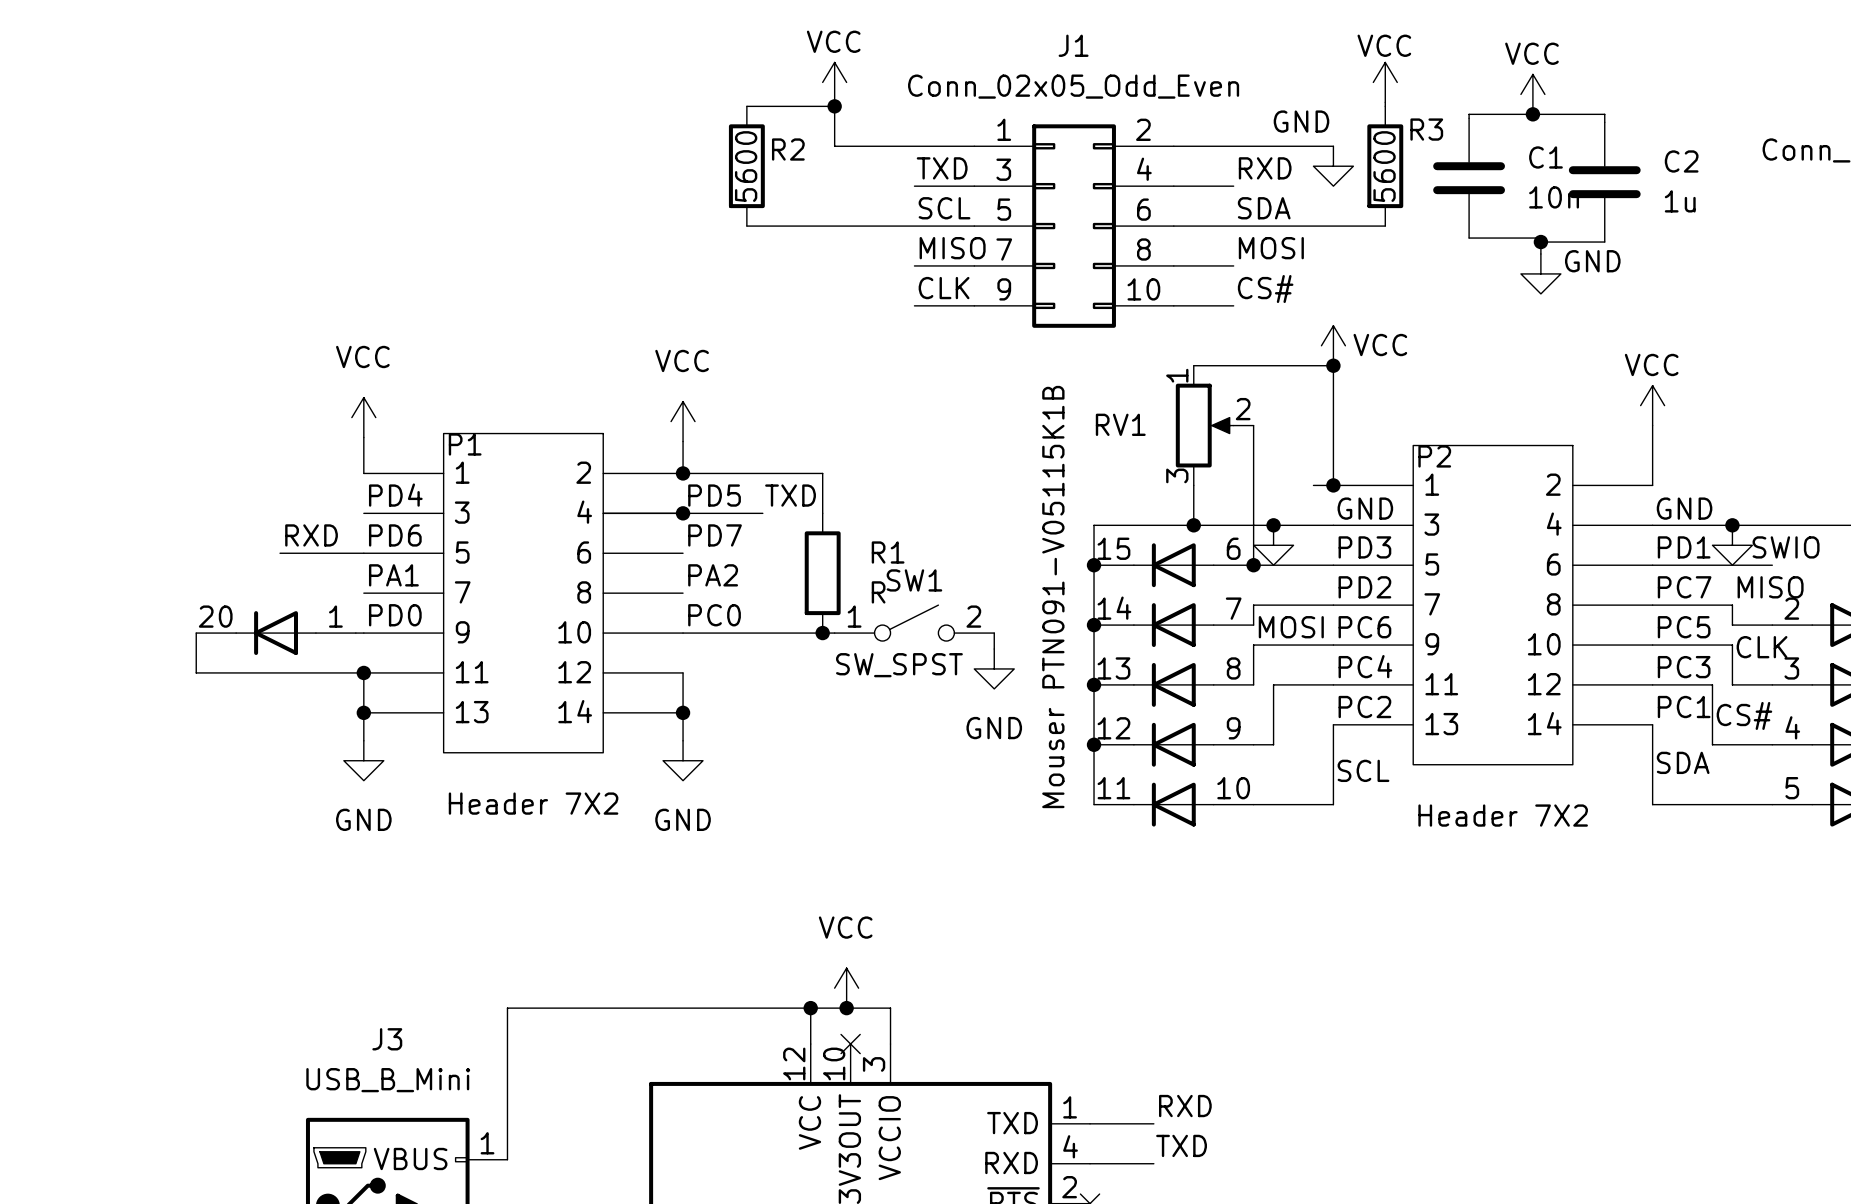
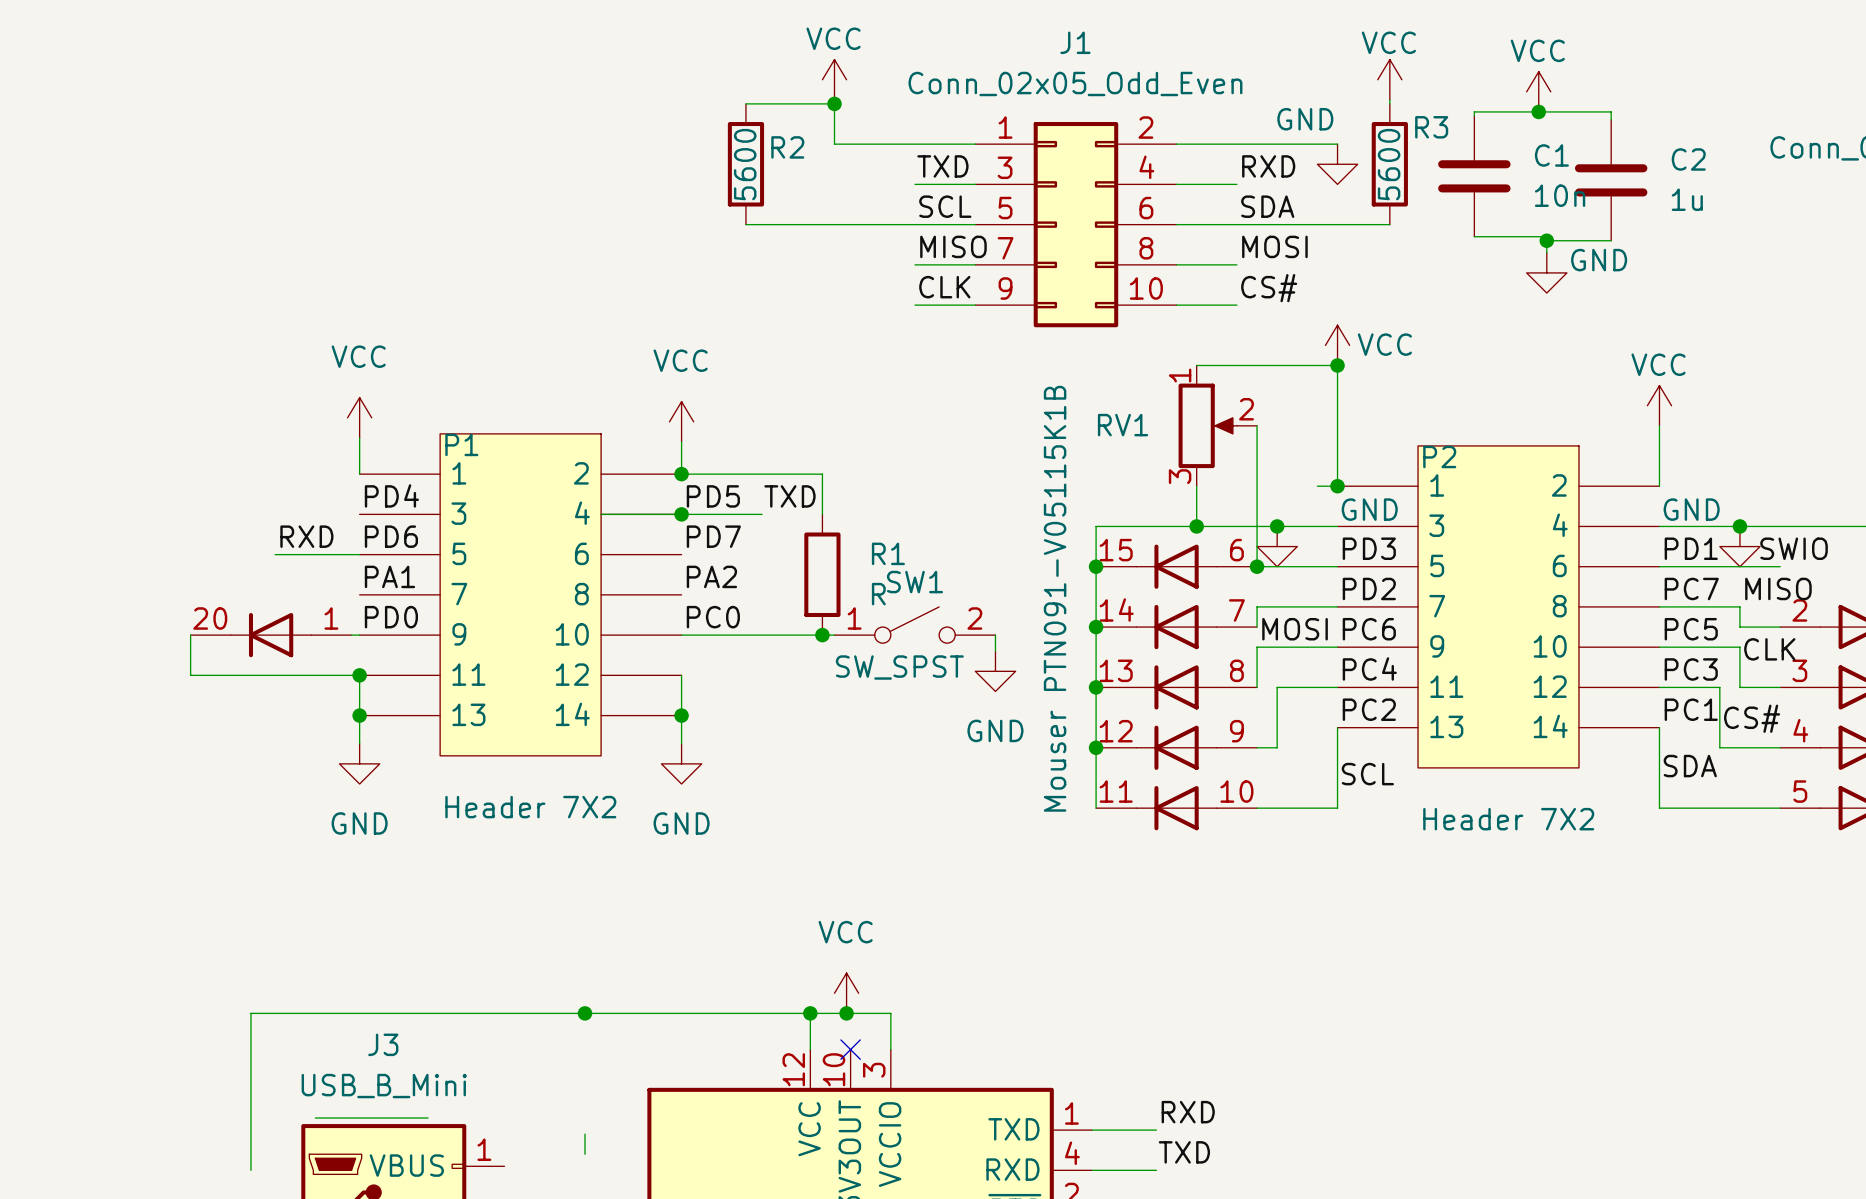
wire: (507, 1008) (507, 1159) -> (504, 1013) (250, 1013) (250, 1170)
junction: none -> (584, 1013)
wire: none -> (315, 1118) (428, 1118)
wire: none -> (584, 1134) (584, 1154)

